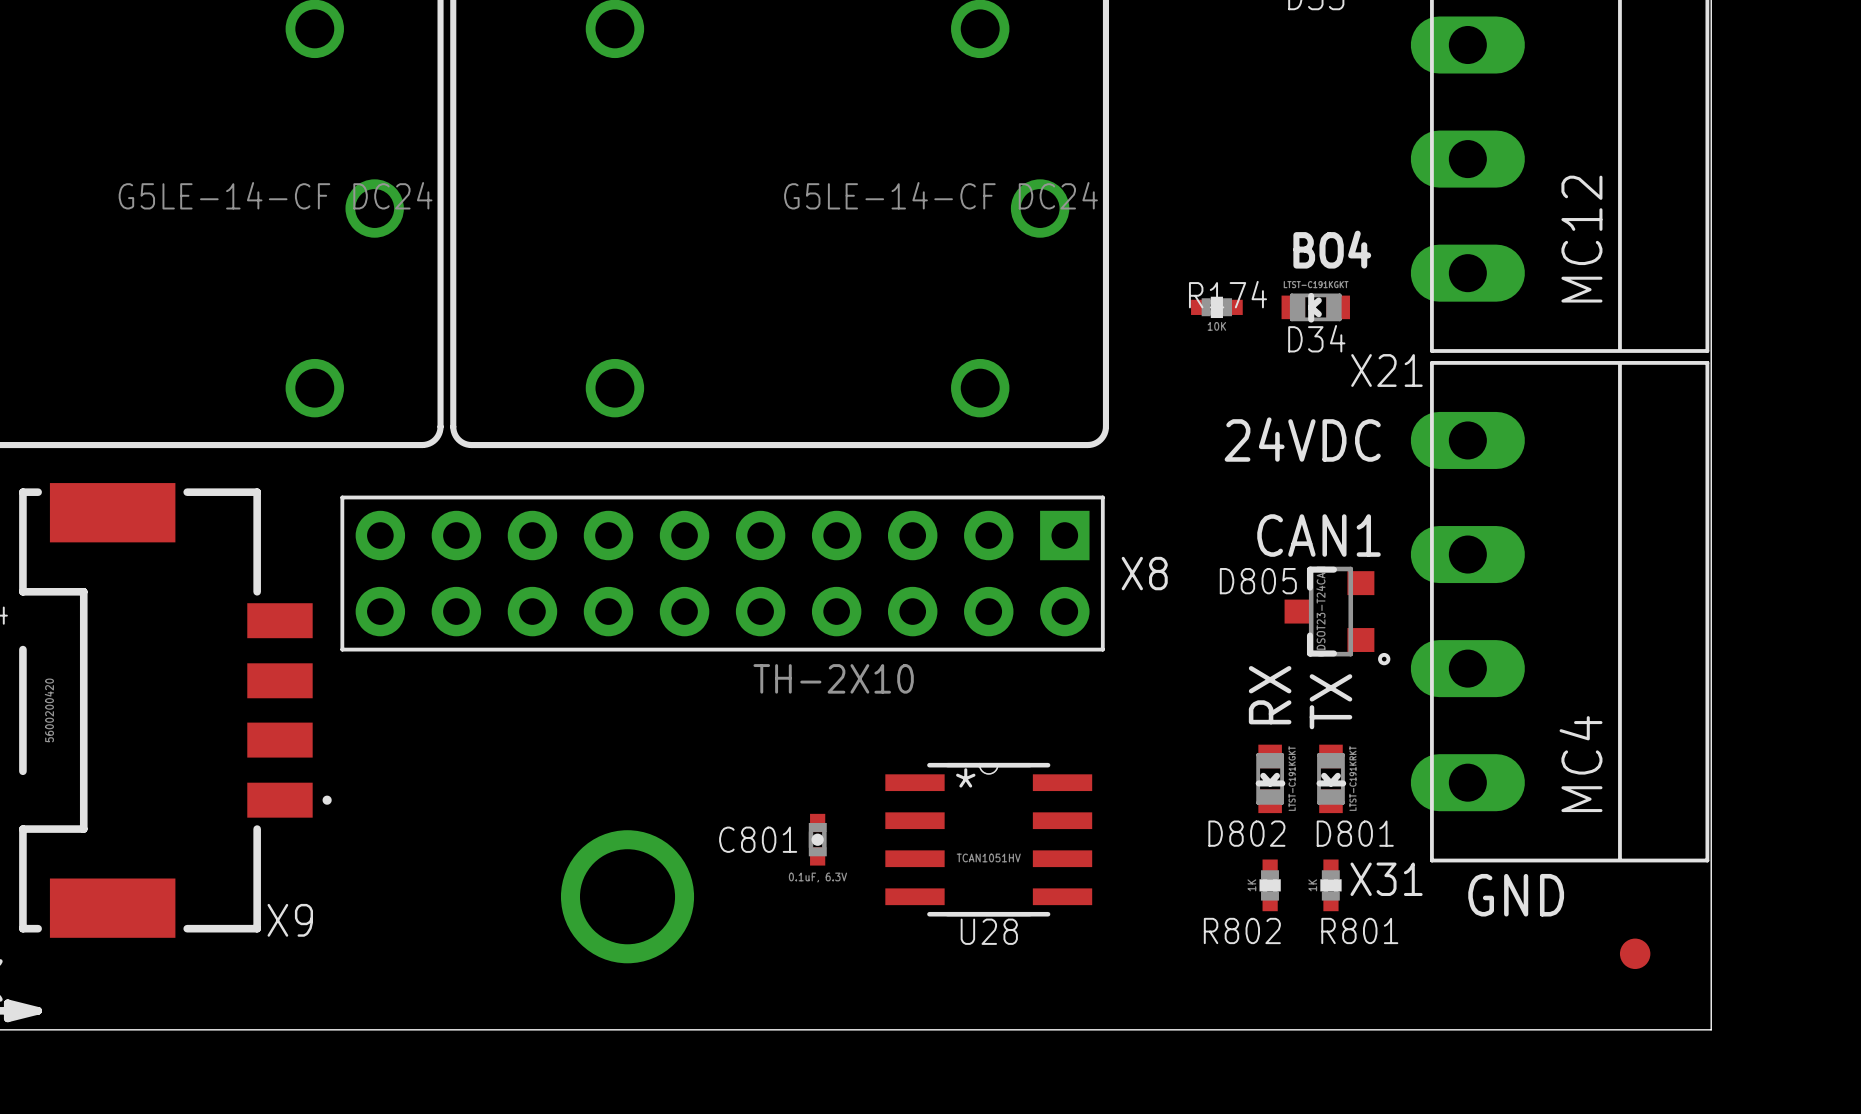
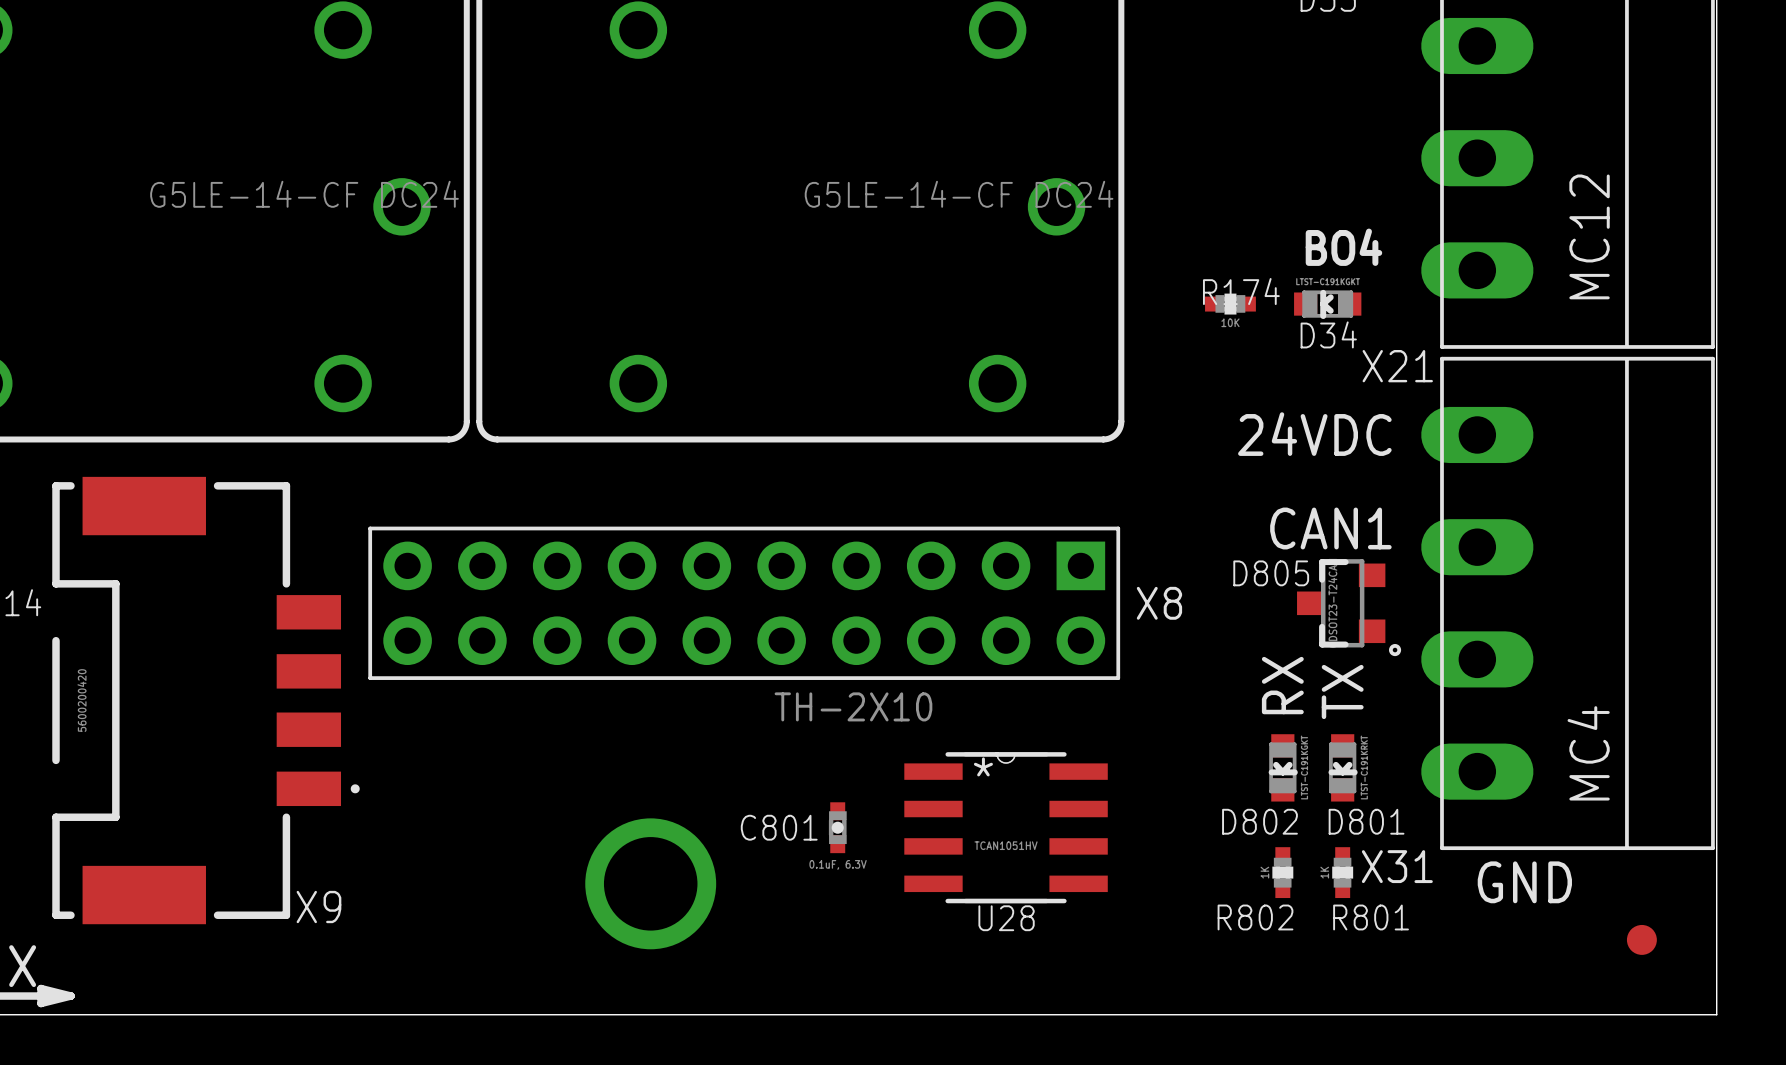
X8 position: (722, 573) -> (744, 603)

